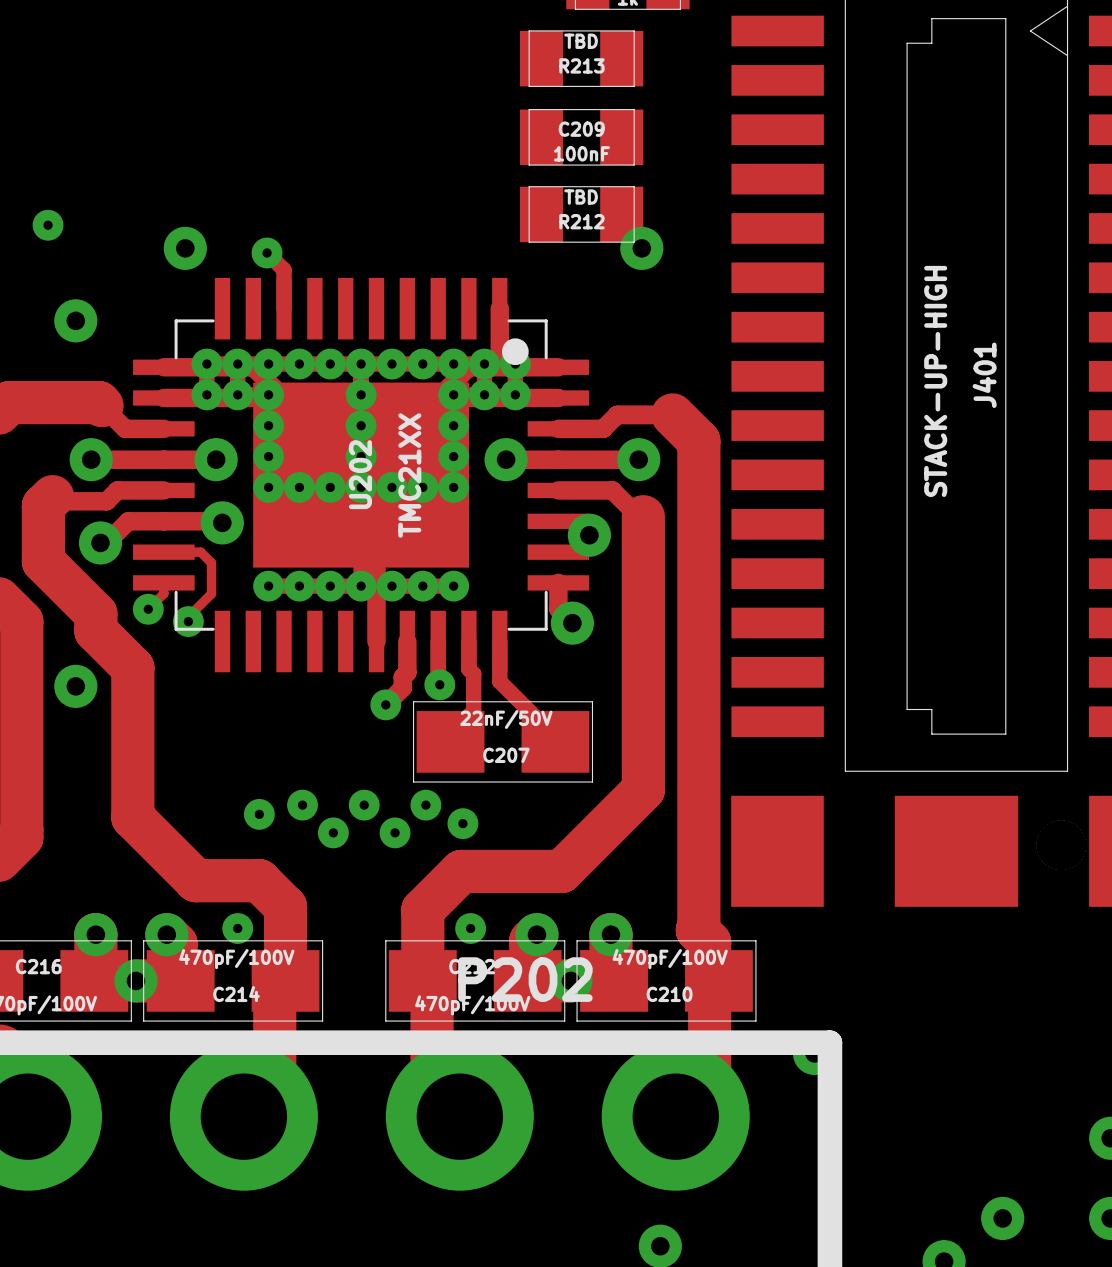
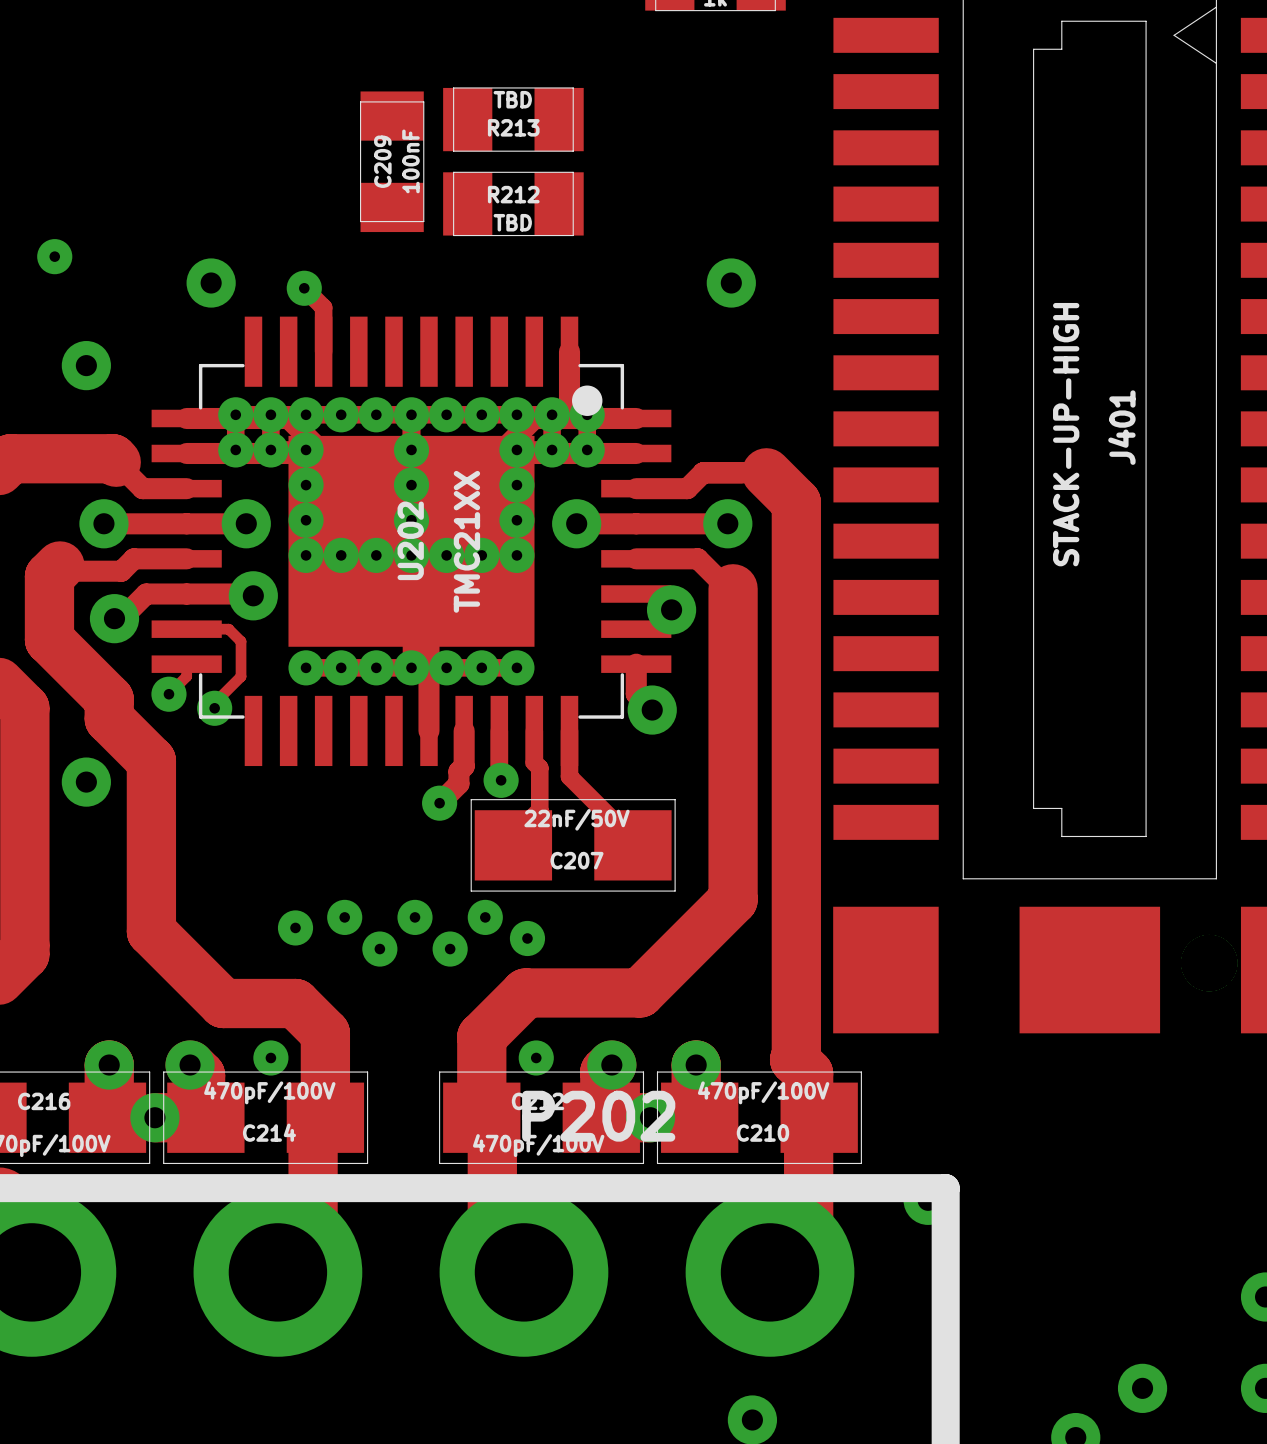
R213 position: (581, 58) -> (513, 119)
C209 rotation: 0° (581, 137) -> 90° clockwise (392, 161)
C209 position: (581, 137) -> (392, 161)
R212 value position: TBD (581, 197) -> TBD (512, 222)
R212 position: (581, 214) -> (513, 203)
R212 name position: R212 (581, 221) -> R212 (513, 194)

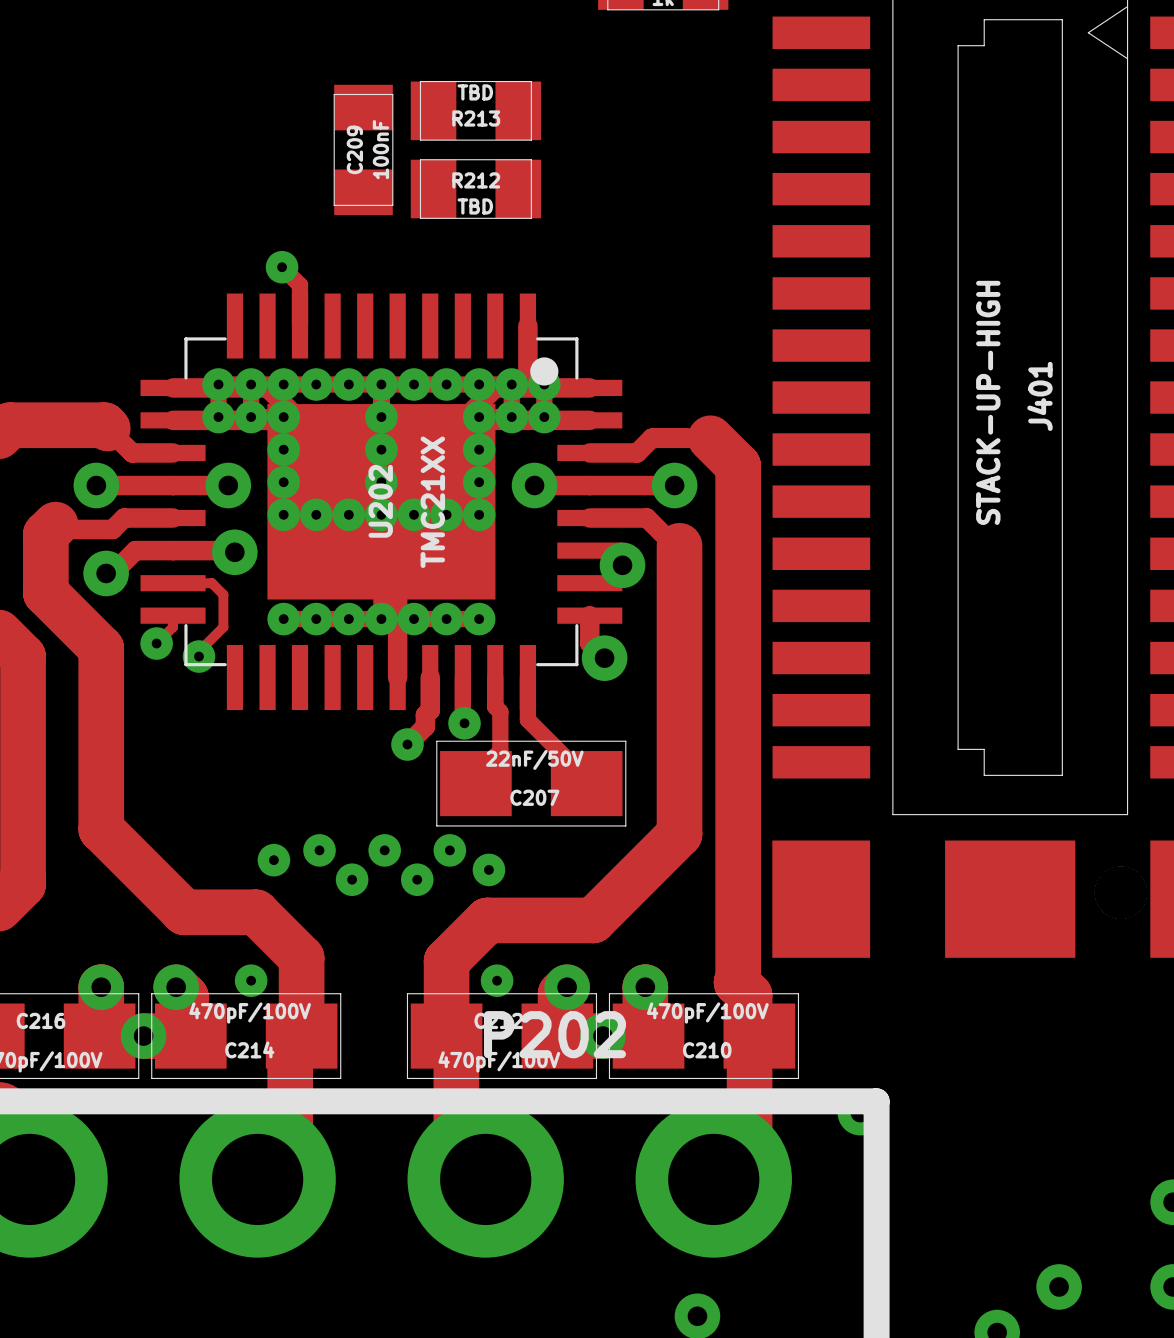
via: (54, 256) -> none
via: (211, 283) -> none
via: (731, 283) -> none
via: (86, 365) -> none
track: (109, 718) (151, 761) (151, 931) (223, 1003) (295, 1003) -> (101, 666) (101, 829) (184, 912) (256, 912) (273, 930)
via: (86, 782) -> none

